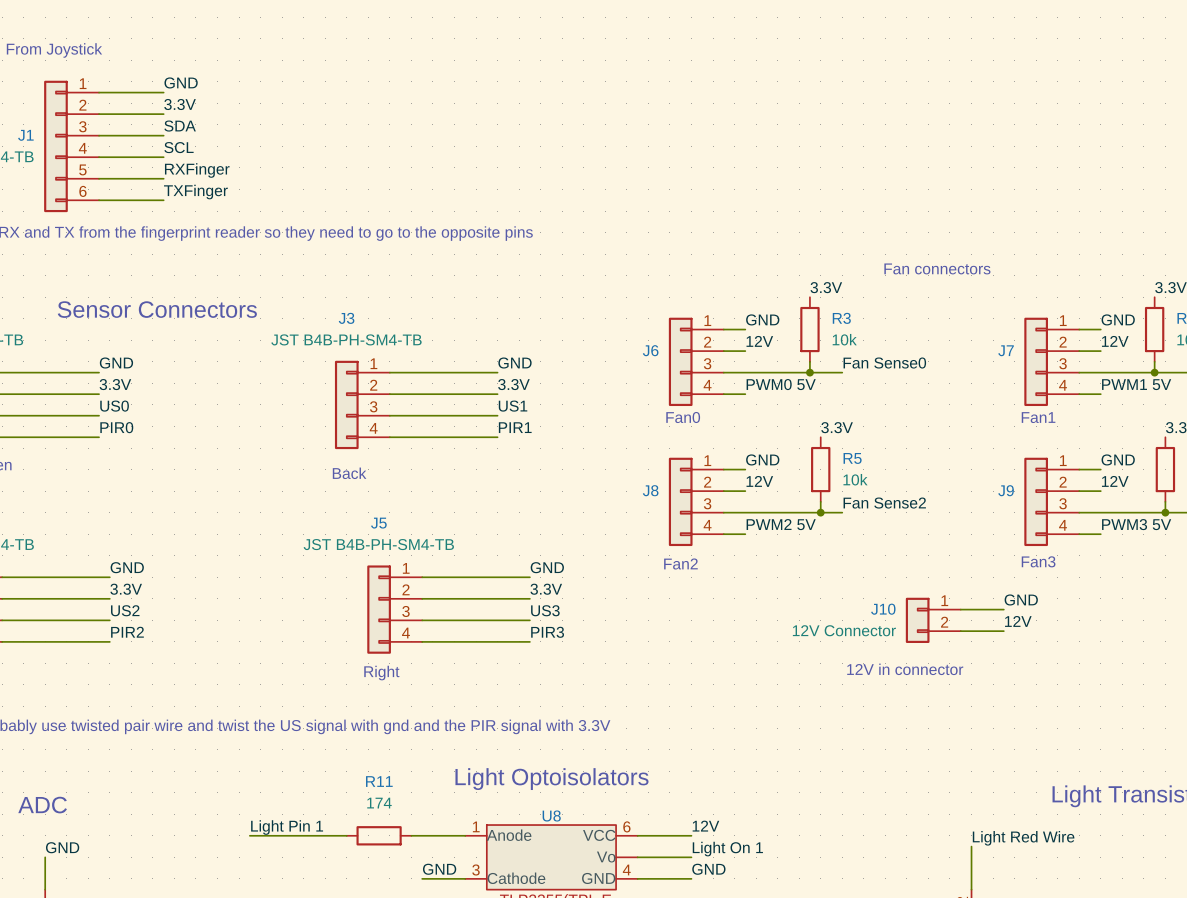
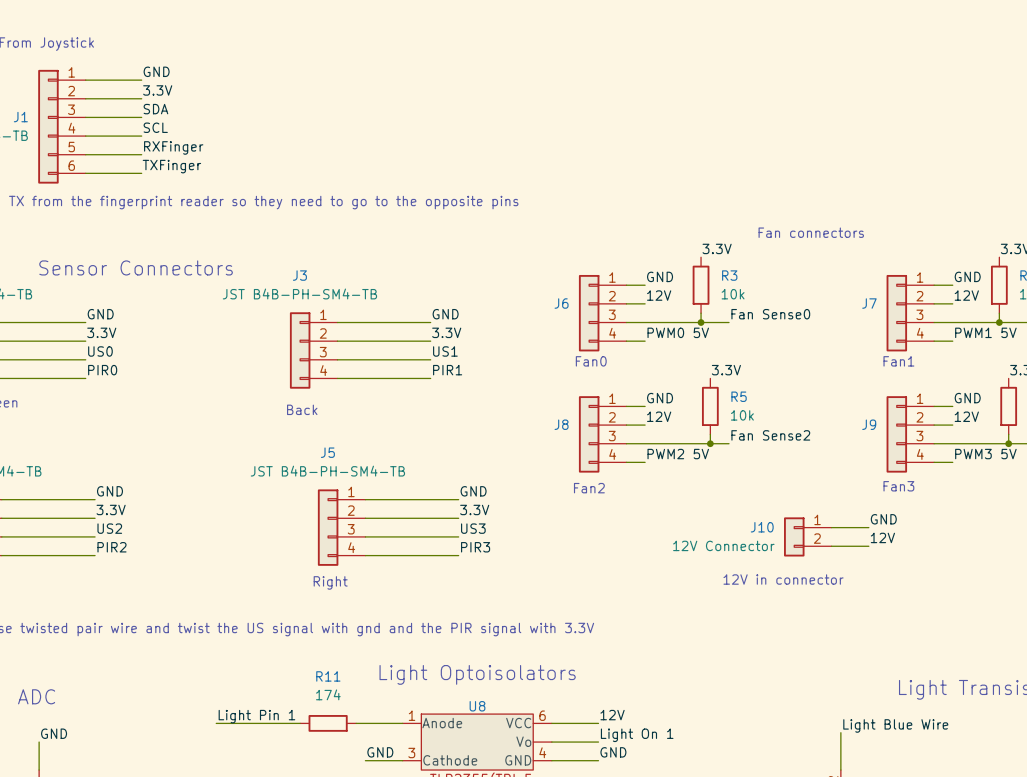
label: Light Red Wire (1023, 838) -> Light Blue Wire (895, 725)

